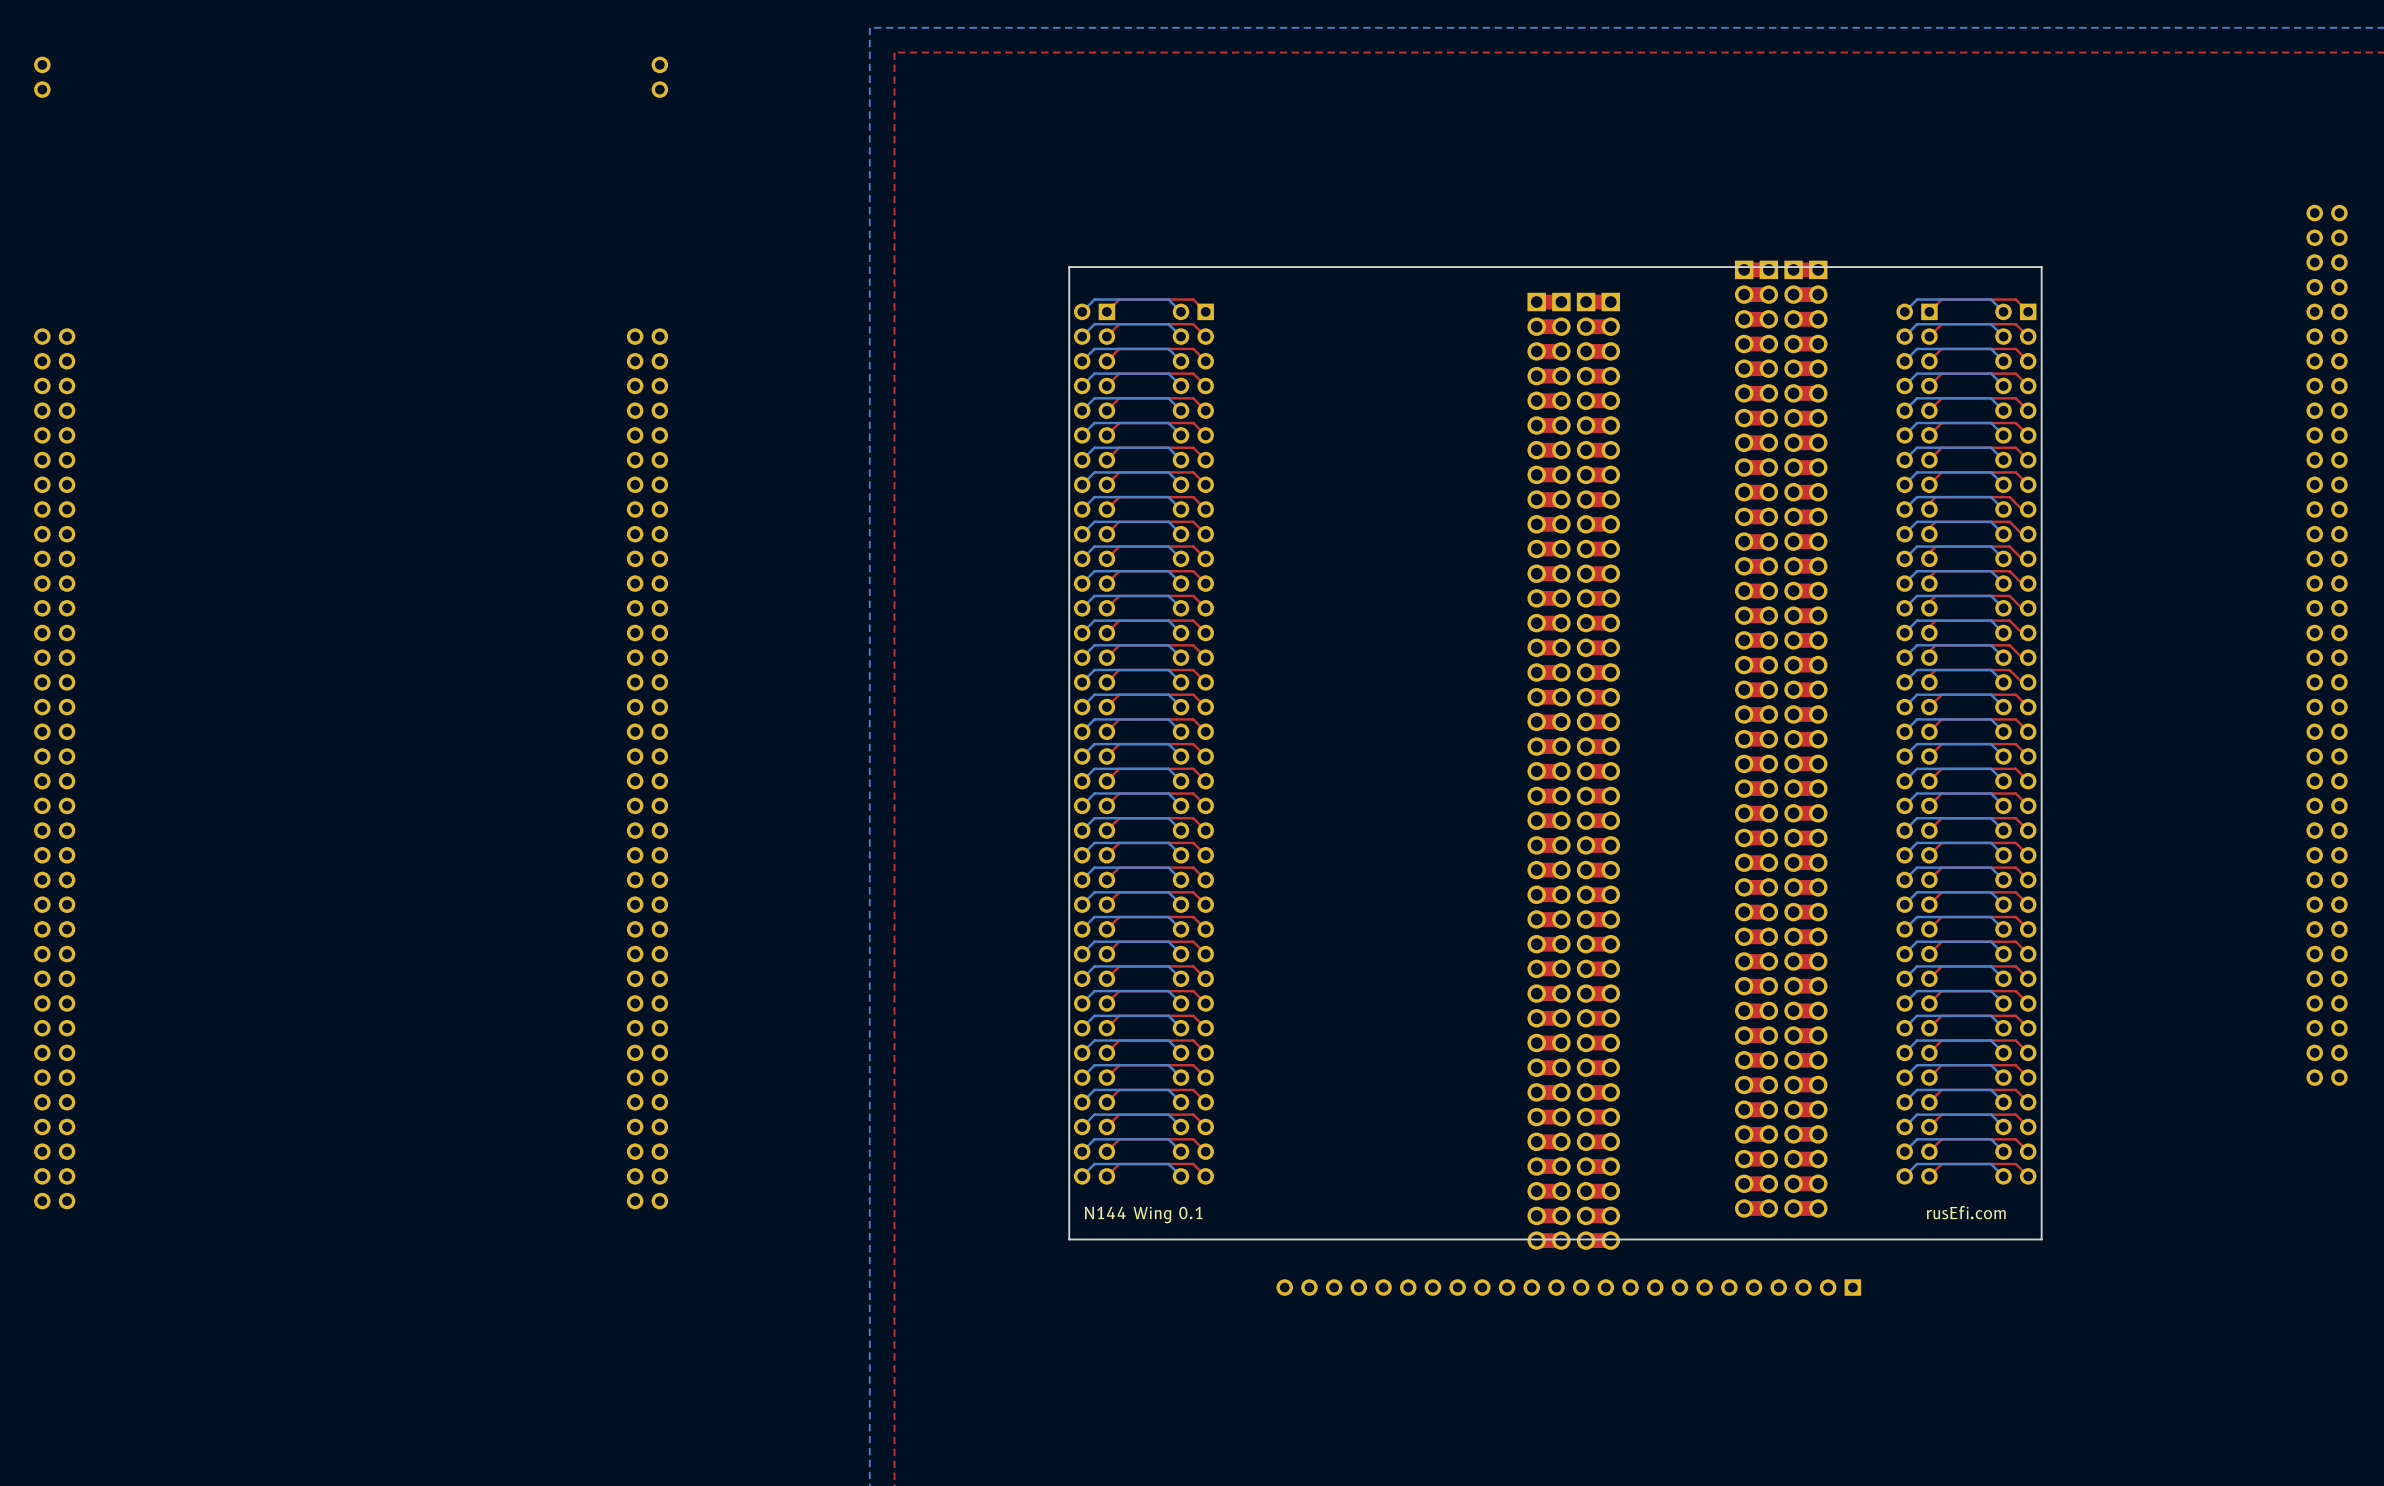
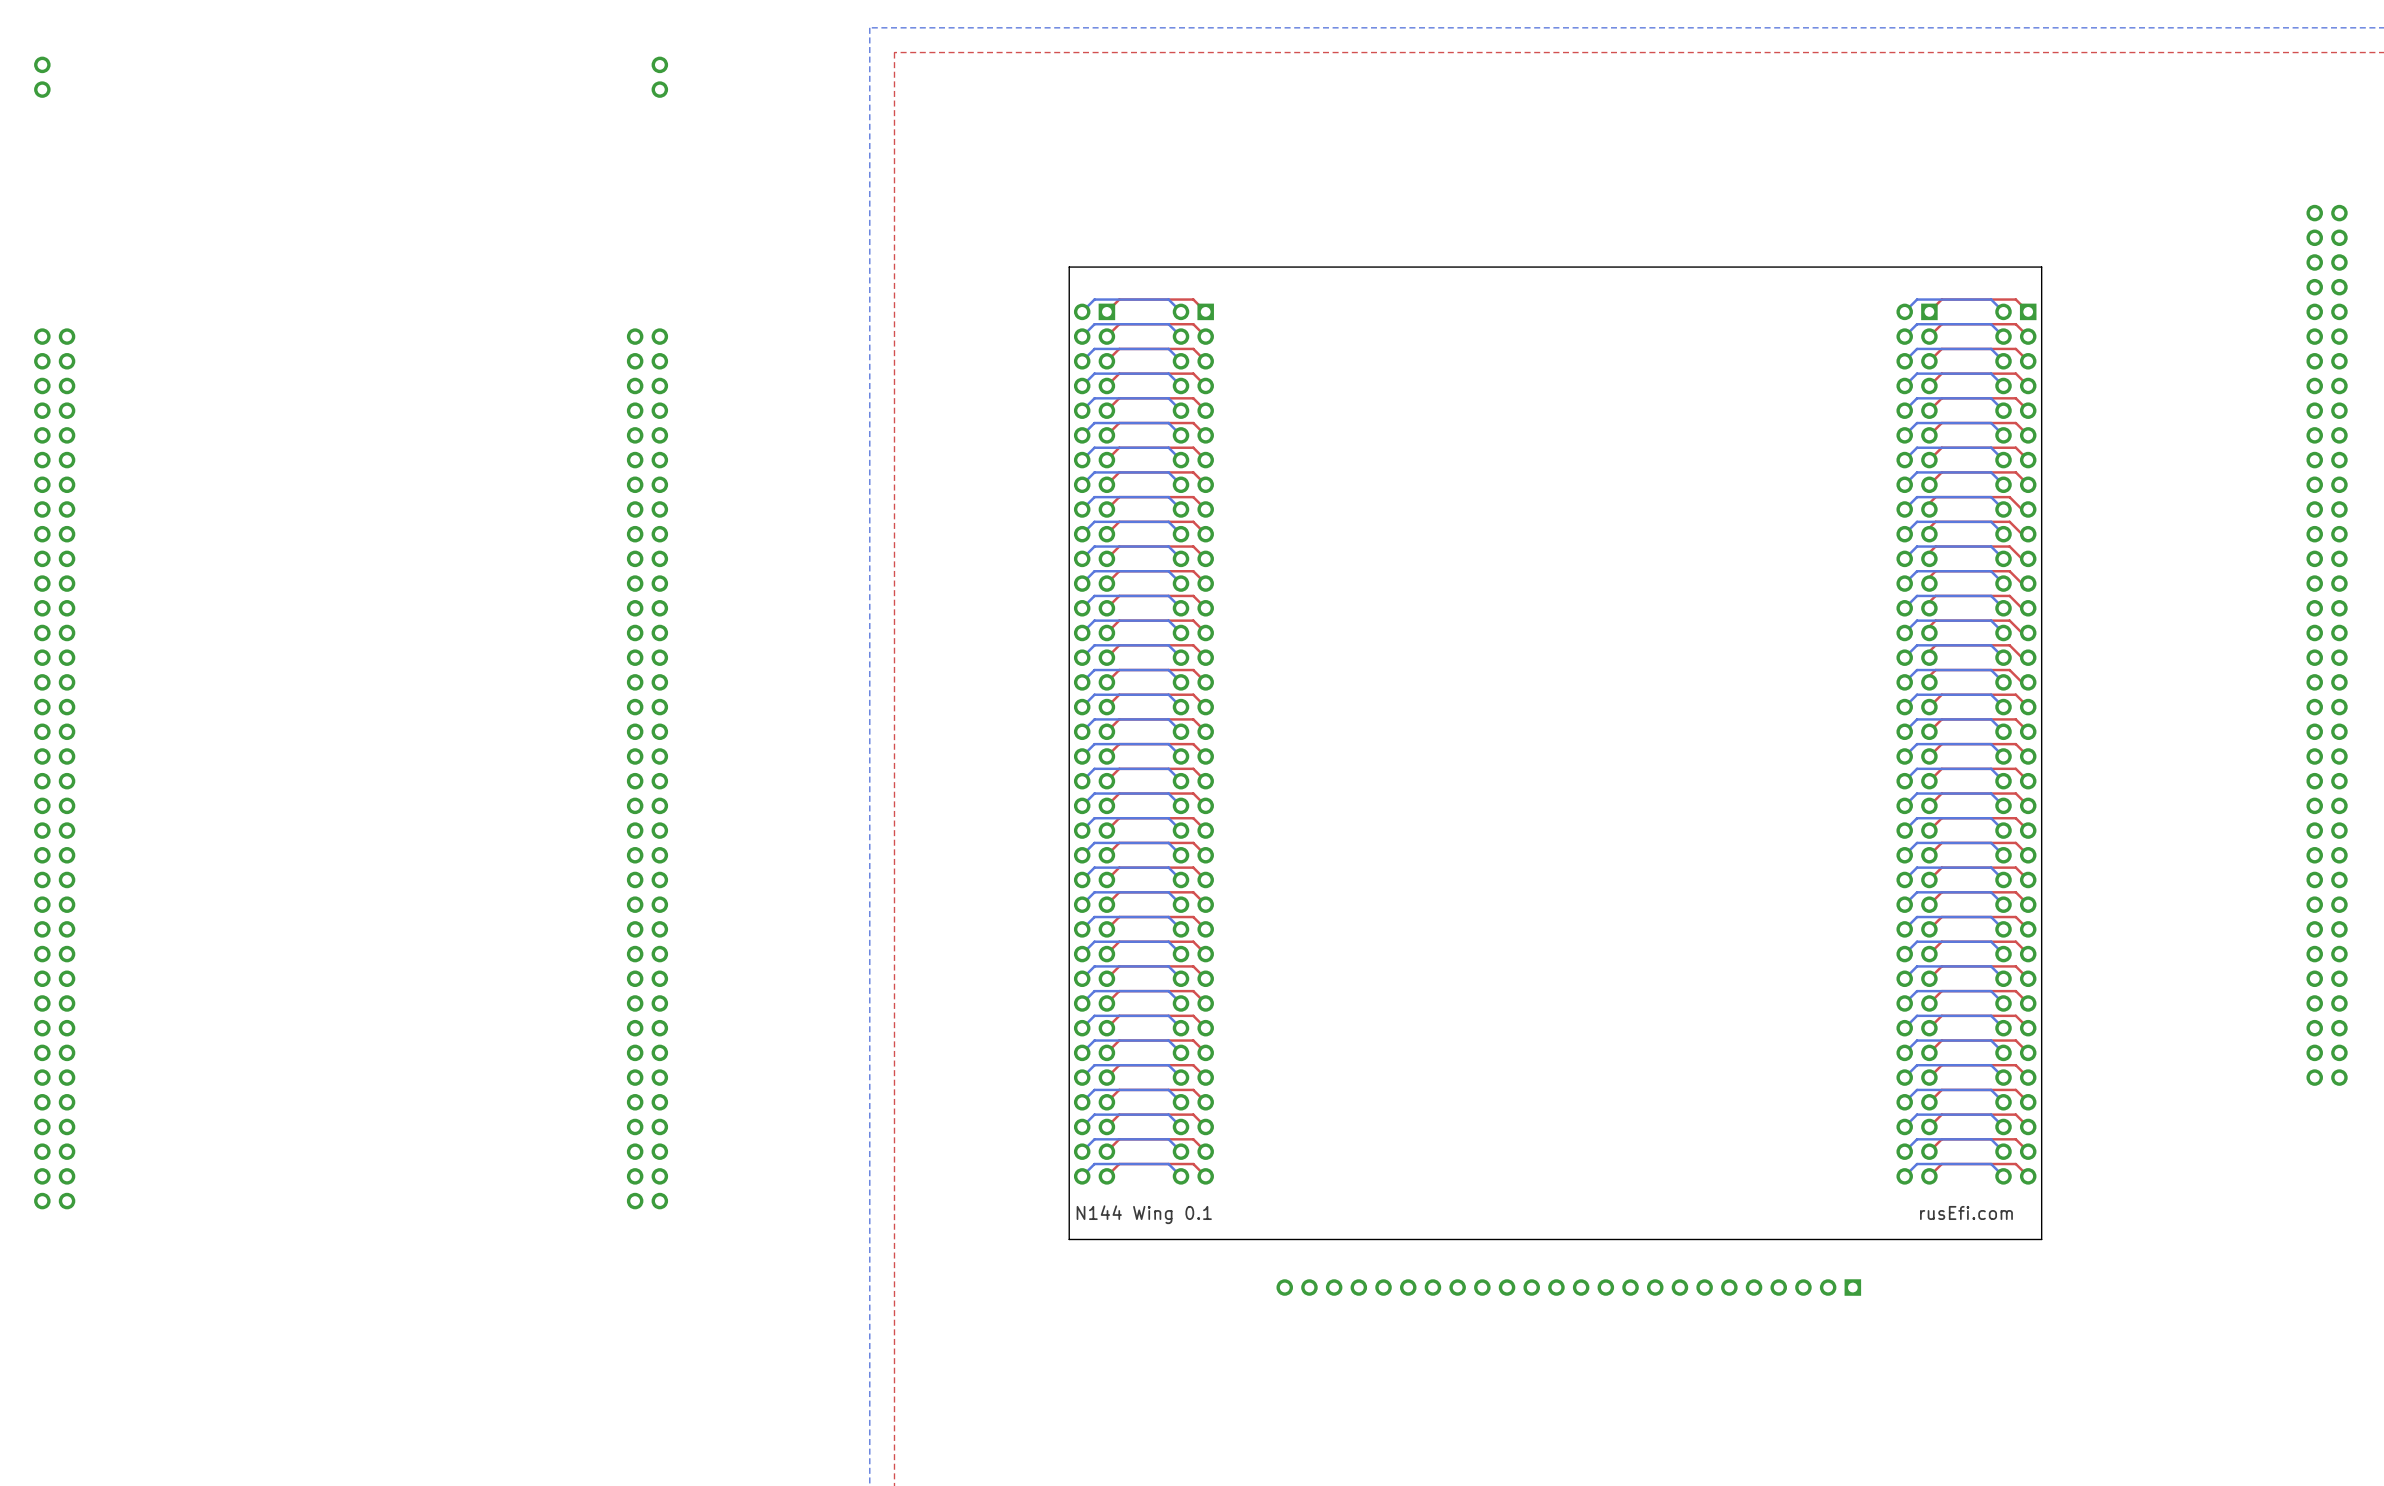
part: (1781, 739) -> none
part: (1573, 771) -> none

